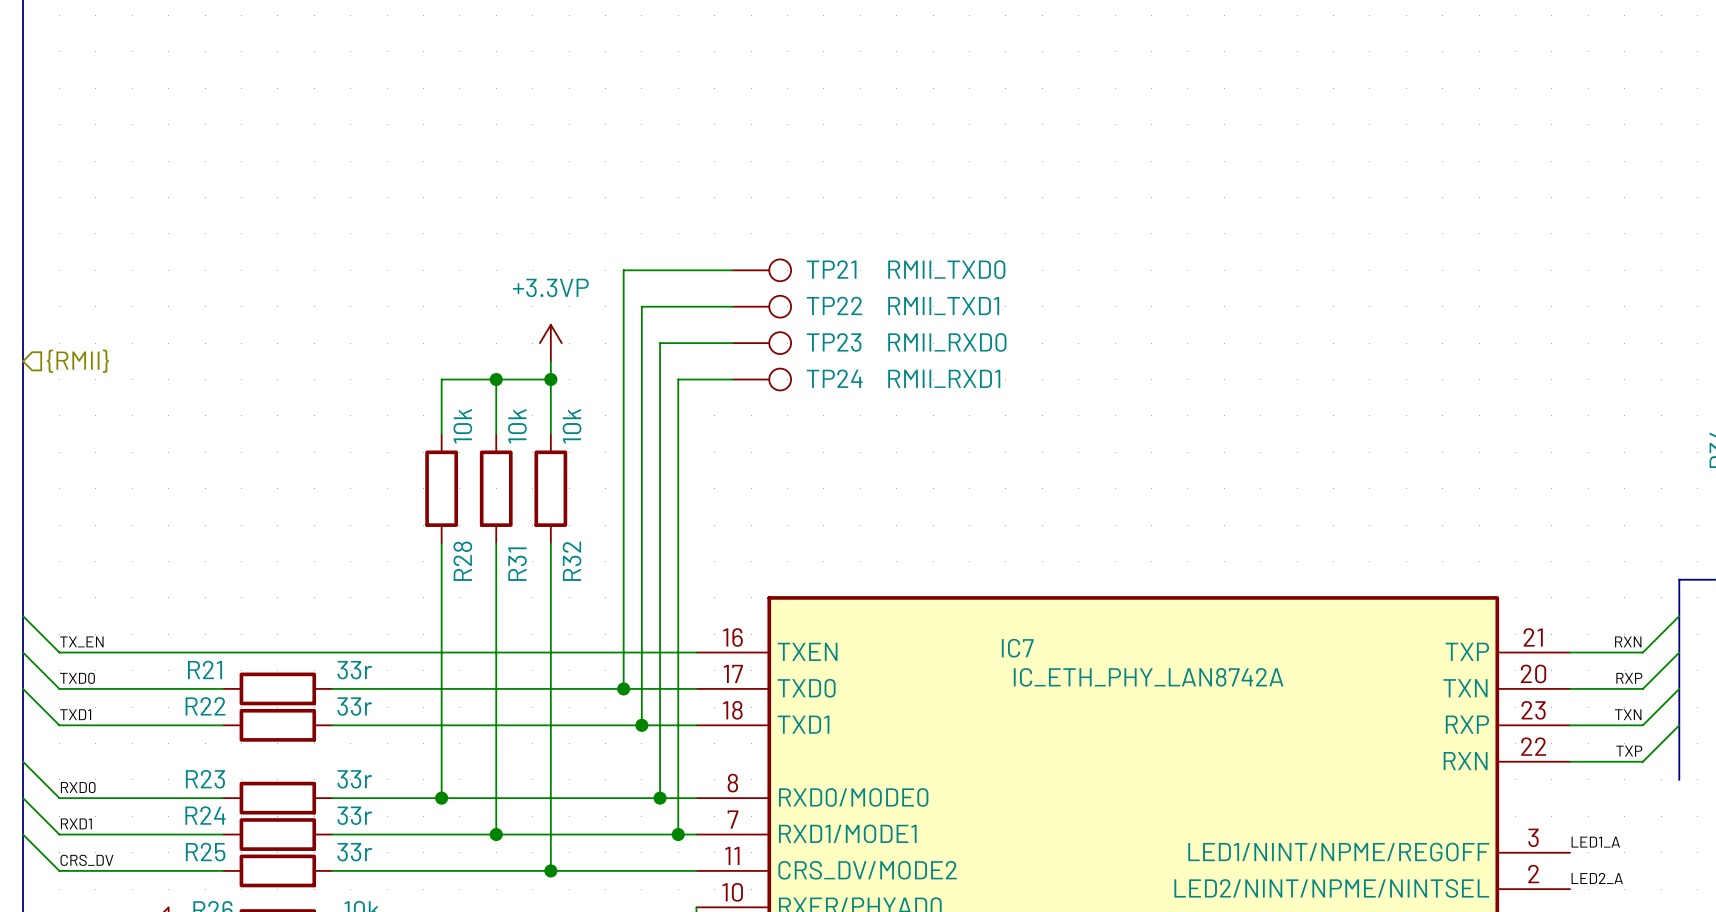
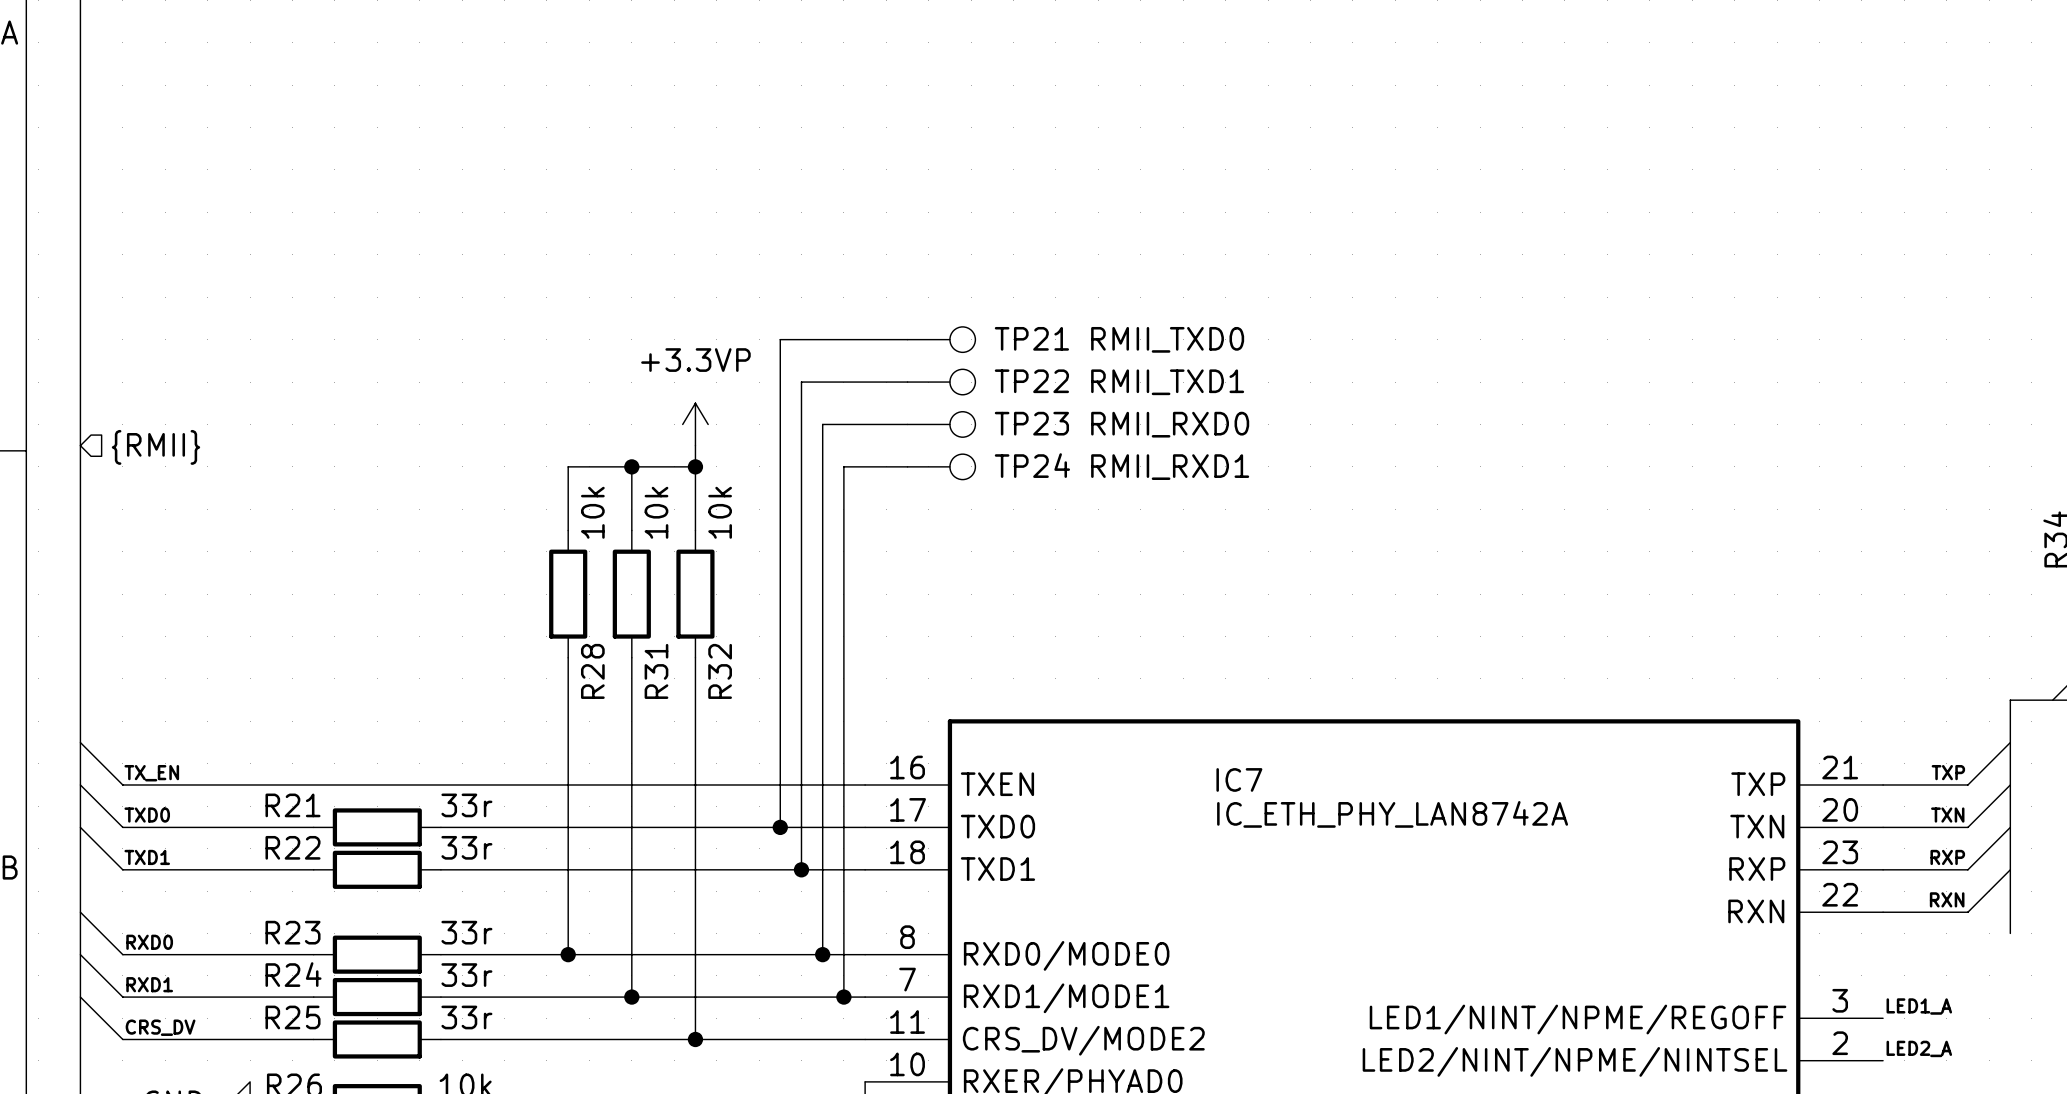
label: RXN (1628, 641) -> TXP (1948, 772)
label: RXP (1629, 678) -> TXN (1947, 815)
label: TXN (1628, 714) -> RXP (1947, 857)
label: TXP (1629, 751) -> RXN (1947, 899)

